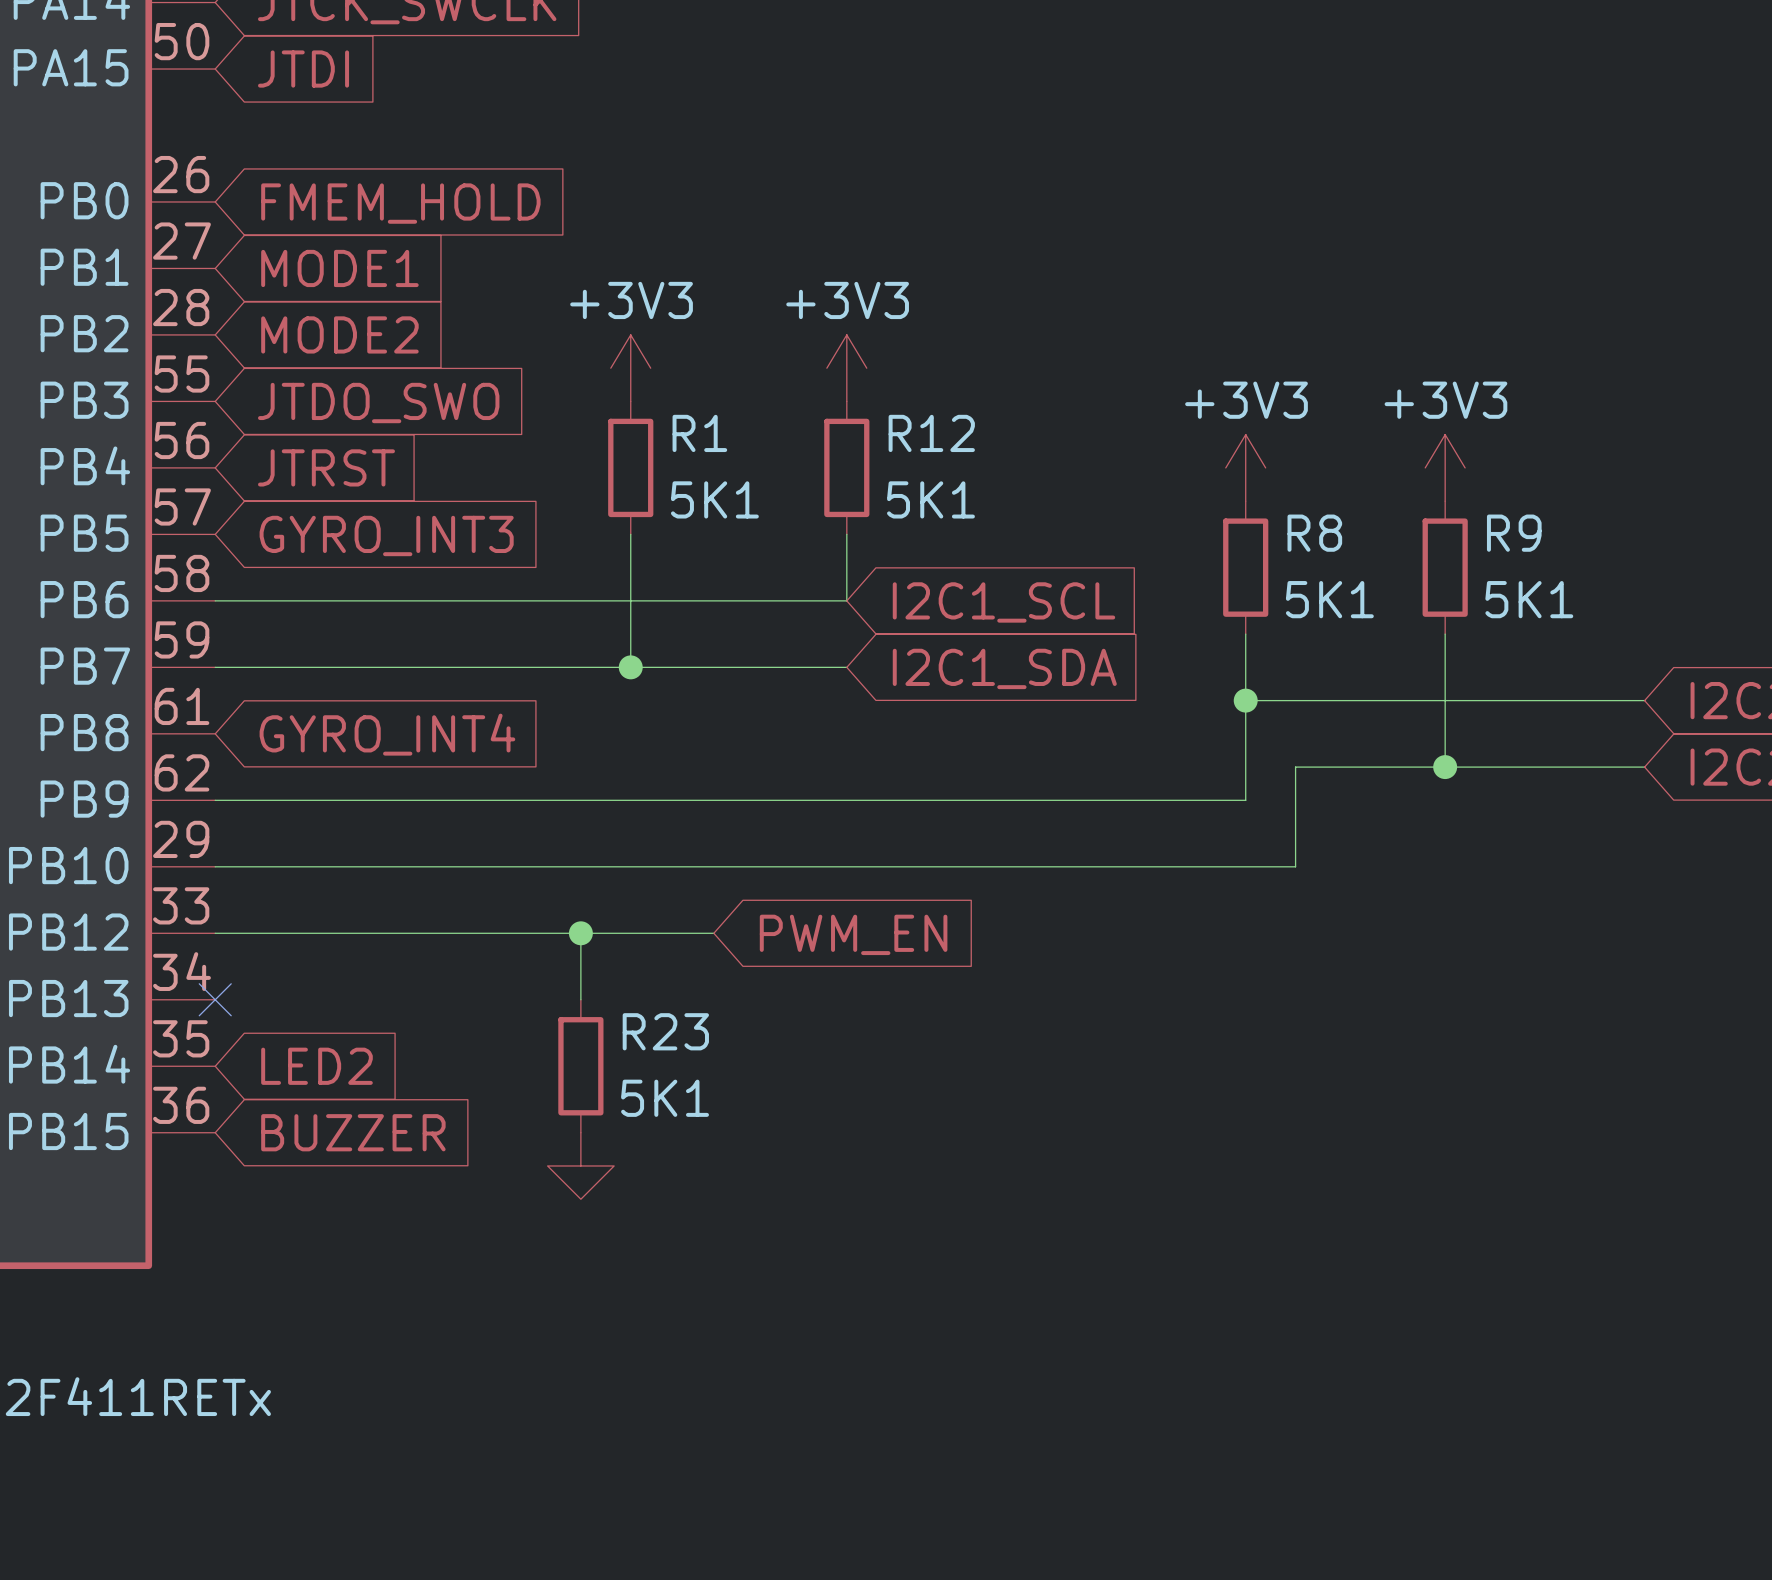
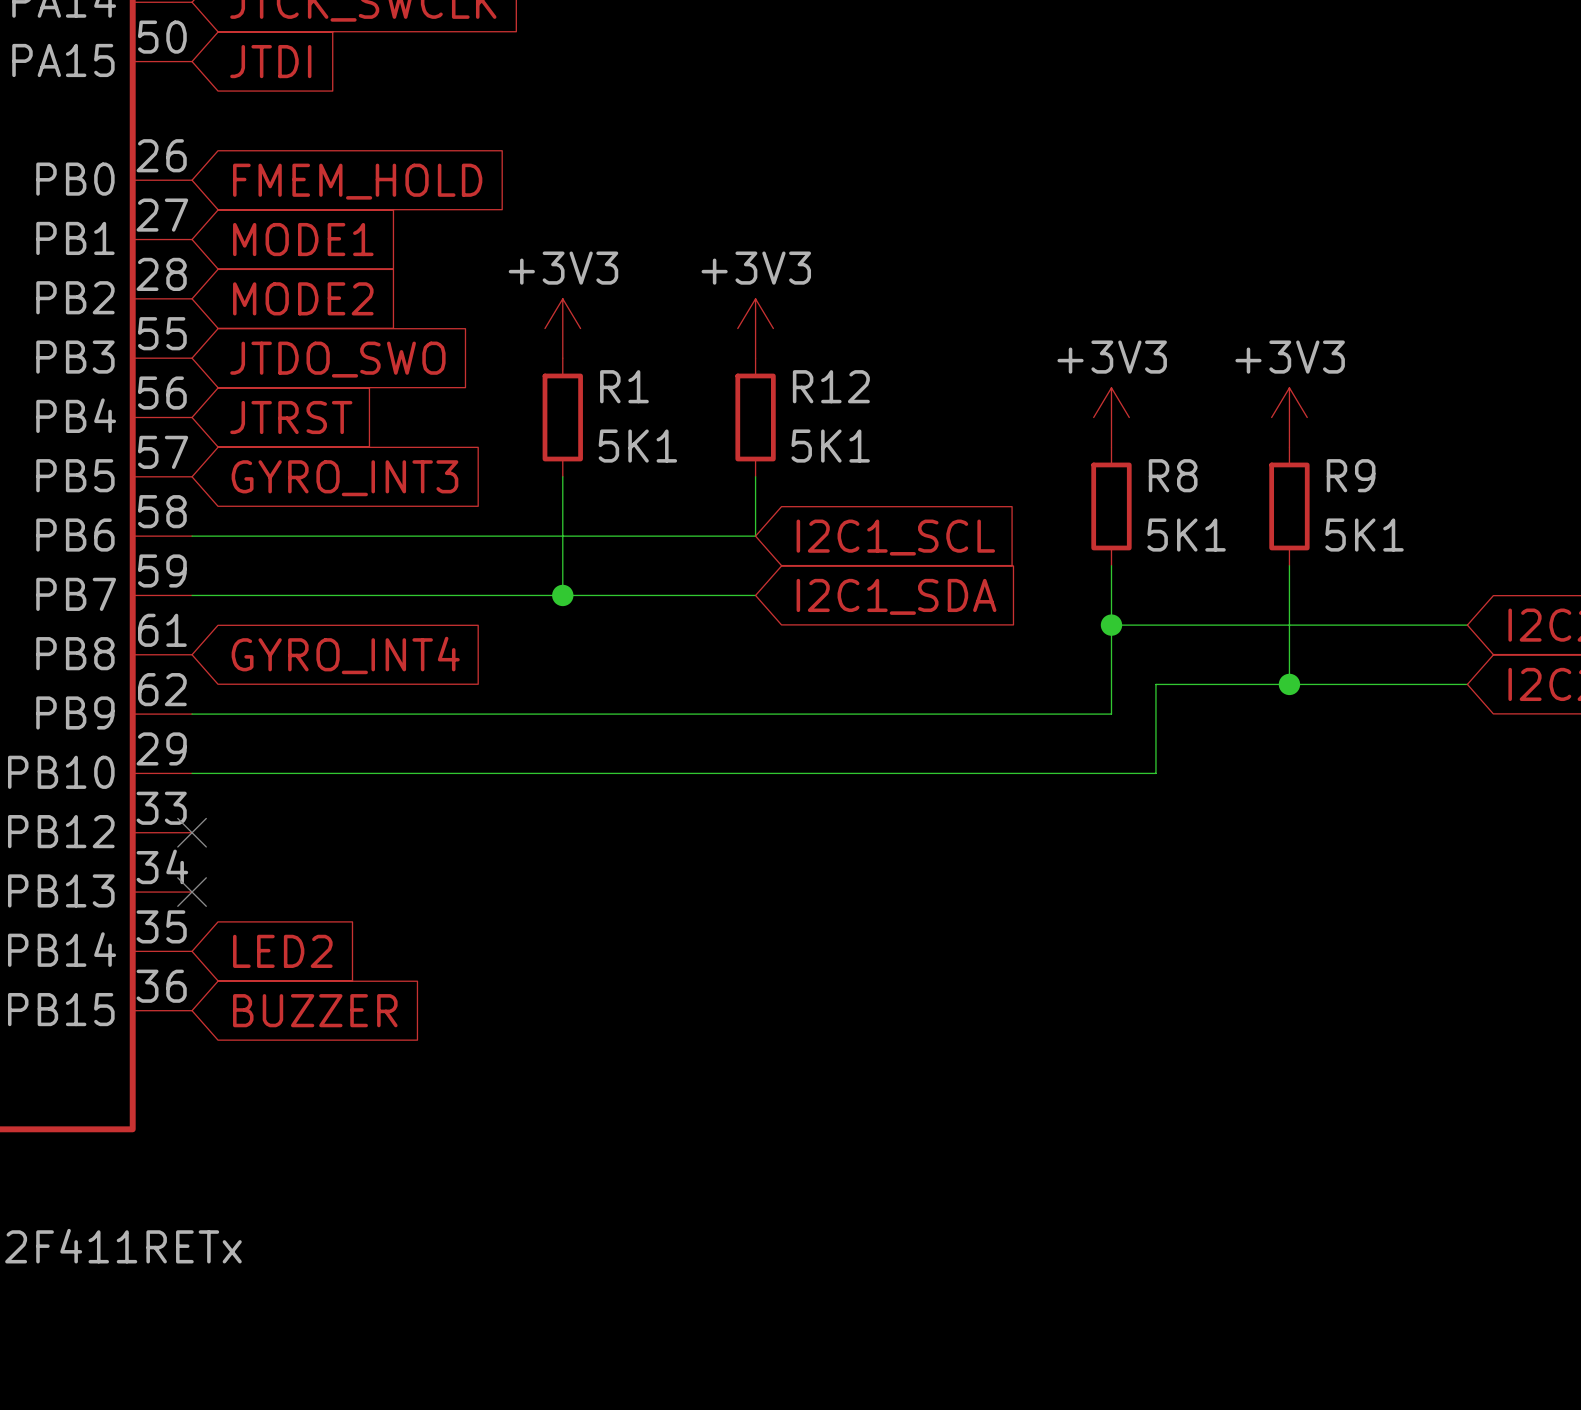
wire: (215, 933) (713, 933) -> none
no-connect mark: none -> (192, 832)
wire: (580, 933) (580, 999) -> none
junction: (580, 933) -> none
global label: PWM_EN (853, 934) -> none
R23: 5K1 (580, 1066) -> none
power symbol: (580, 1165) -> none

